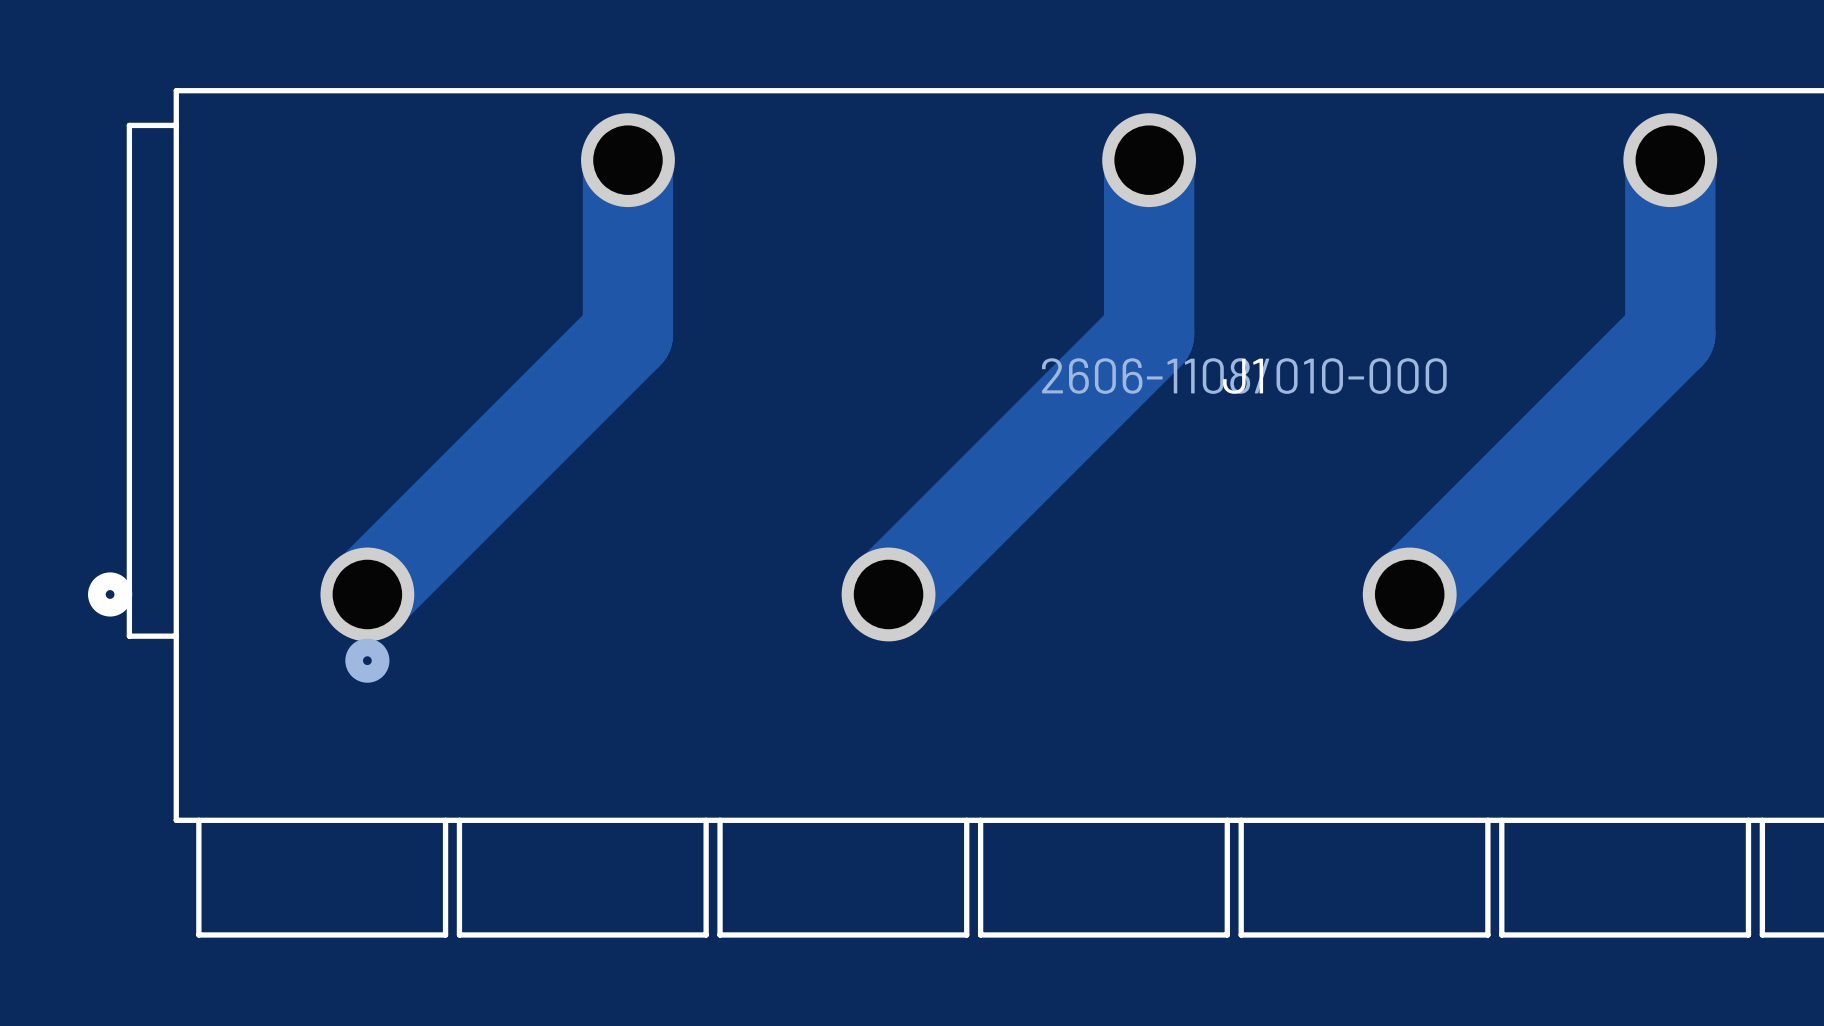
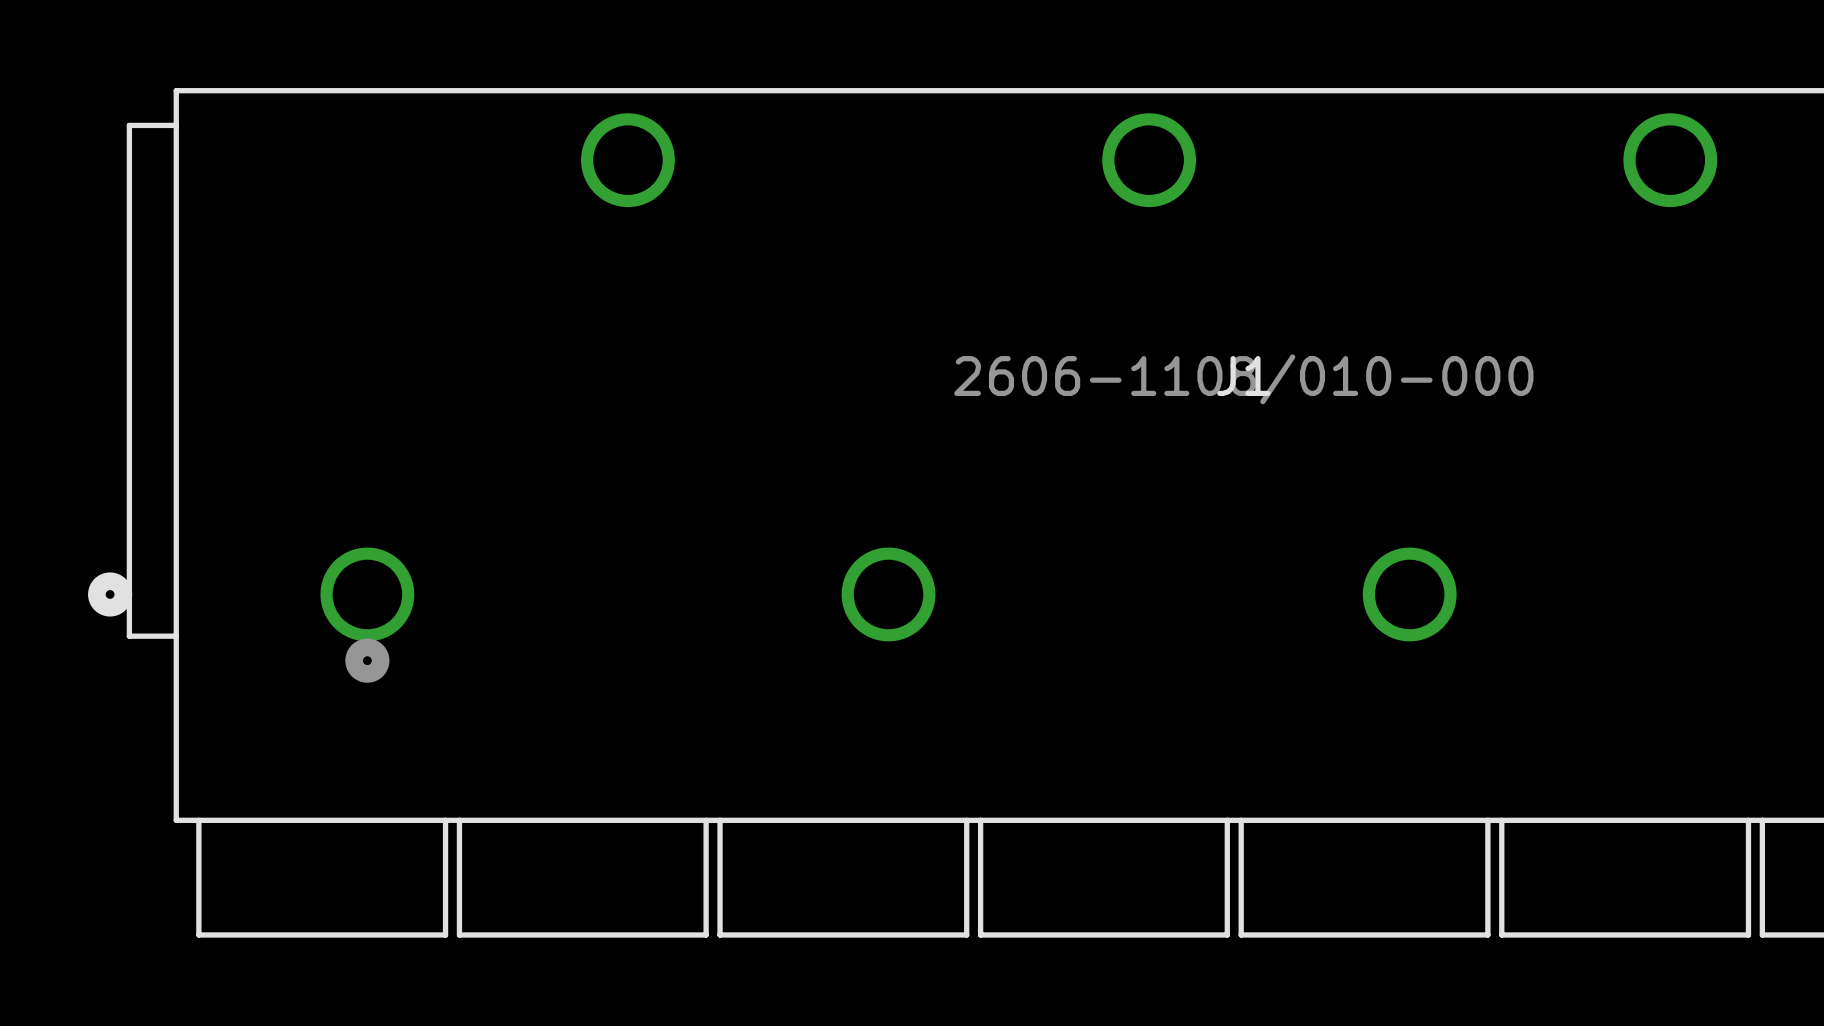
track: (627, 160) (627, 333) (367, 594) -> none
track: (1149, 160) (1149, 333) (888, 594) -> none
track: (1670, 160) (1670, 333) (1409, 594) -> none

